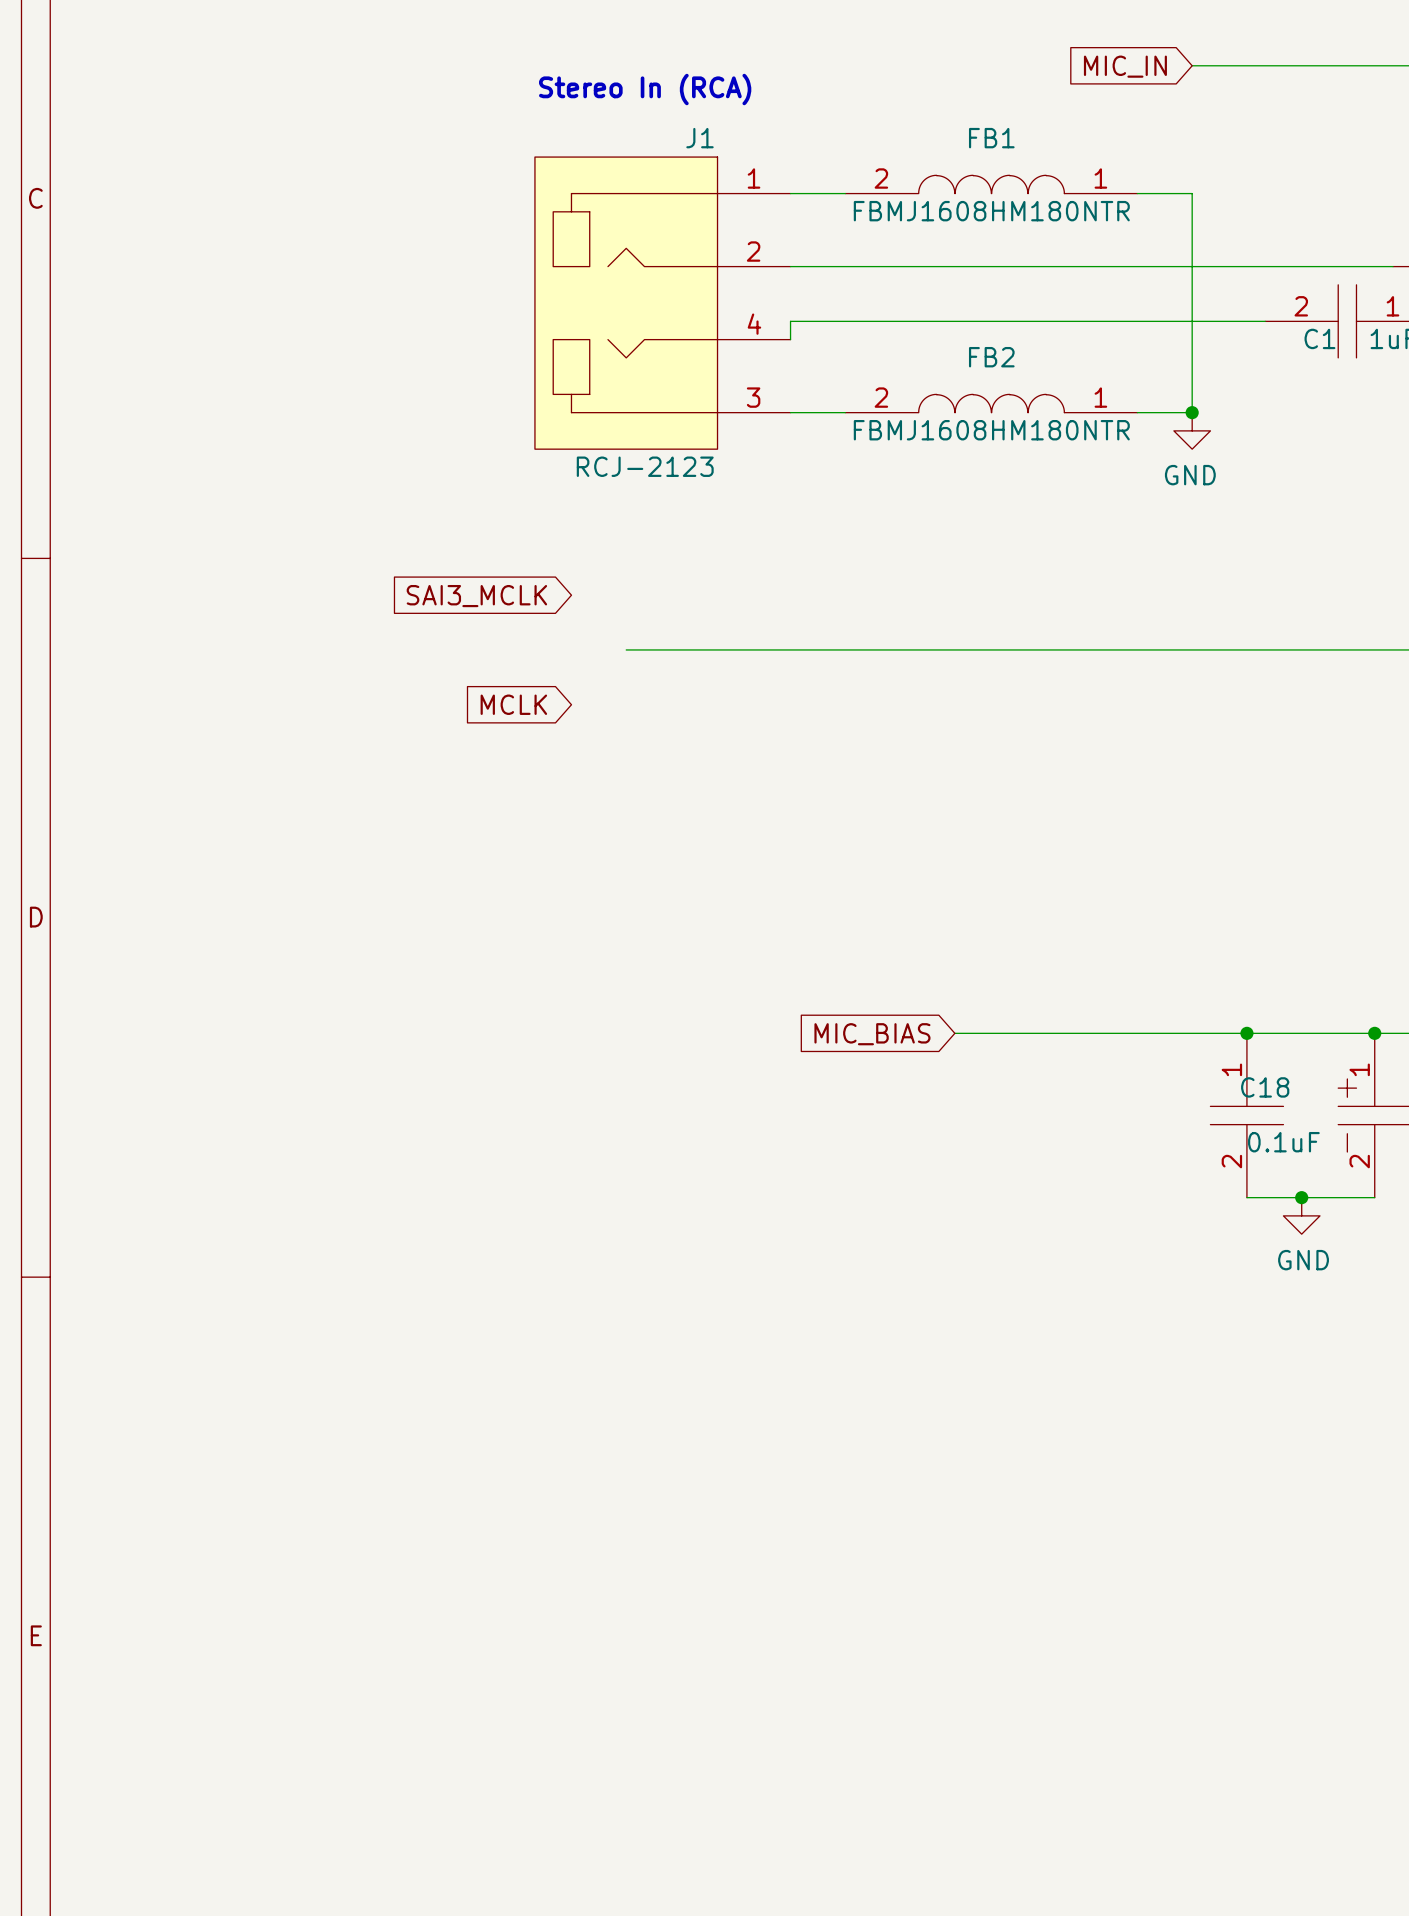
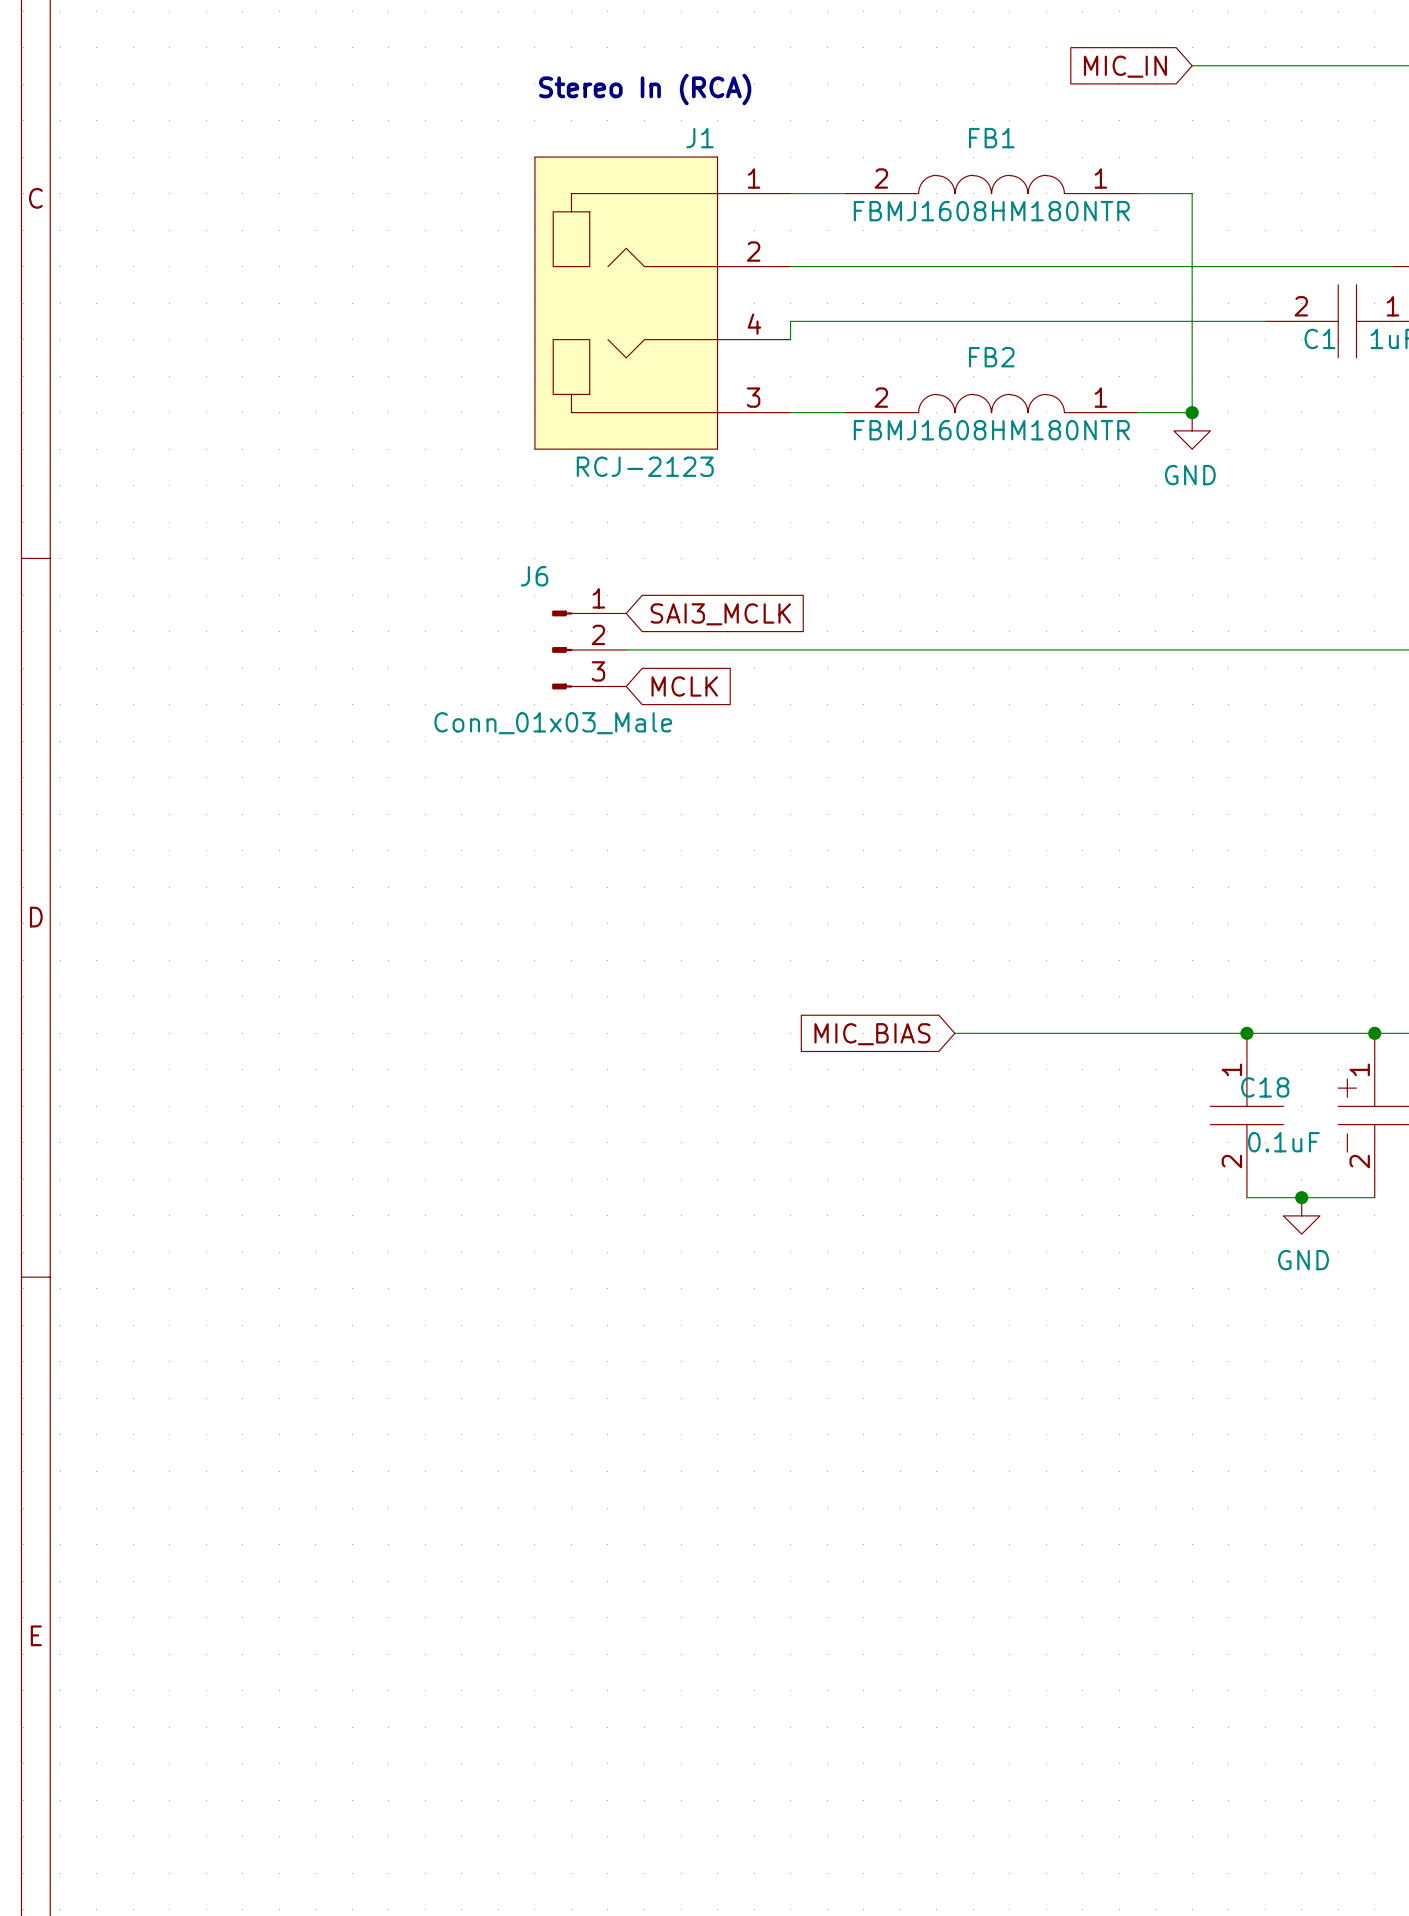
global label rotation: 0° (476, 596) -> 180° (720, 614)
global label position: SAI3_MCLK (476, 596) -> SAI3_MCLK (720, 614)
J6: none -> Conn_01x03_Male (589, 649)
global label rotation: 0° (513, 704) -> 180° (684, 686)
global label position: MCLK (513, 704) -> MCLK (684, 686)

